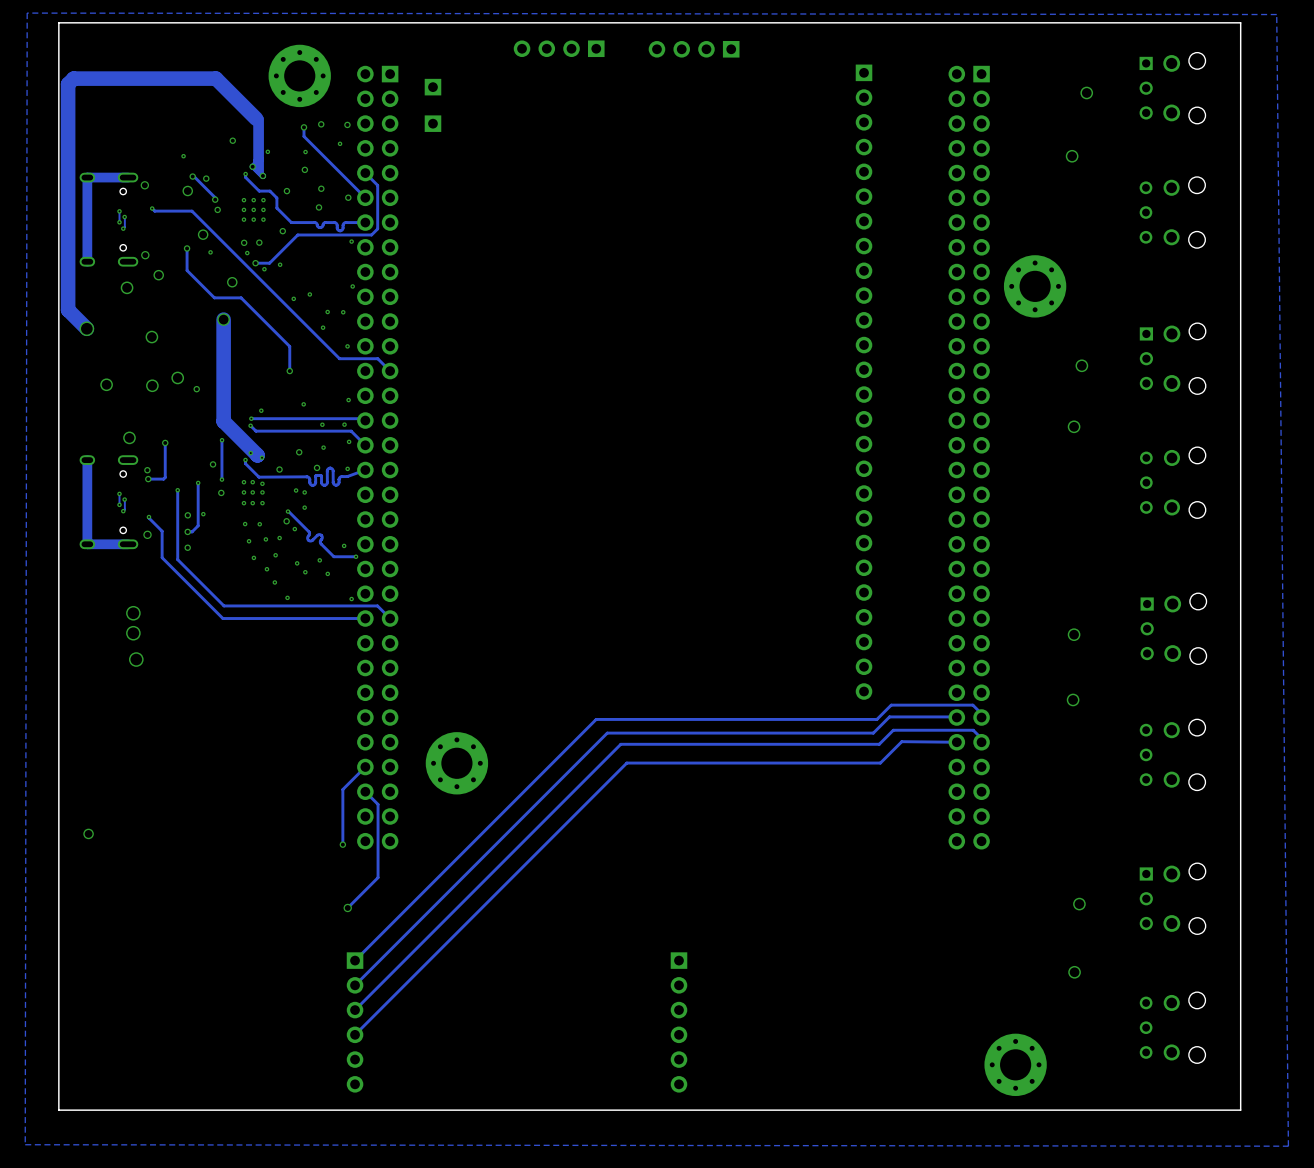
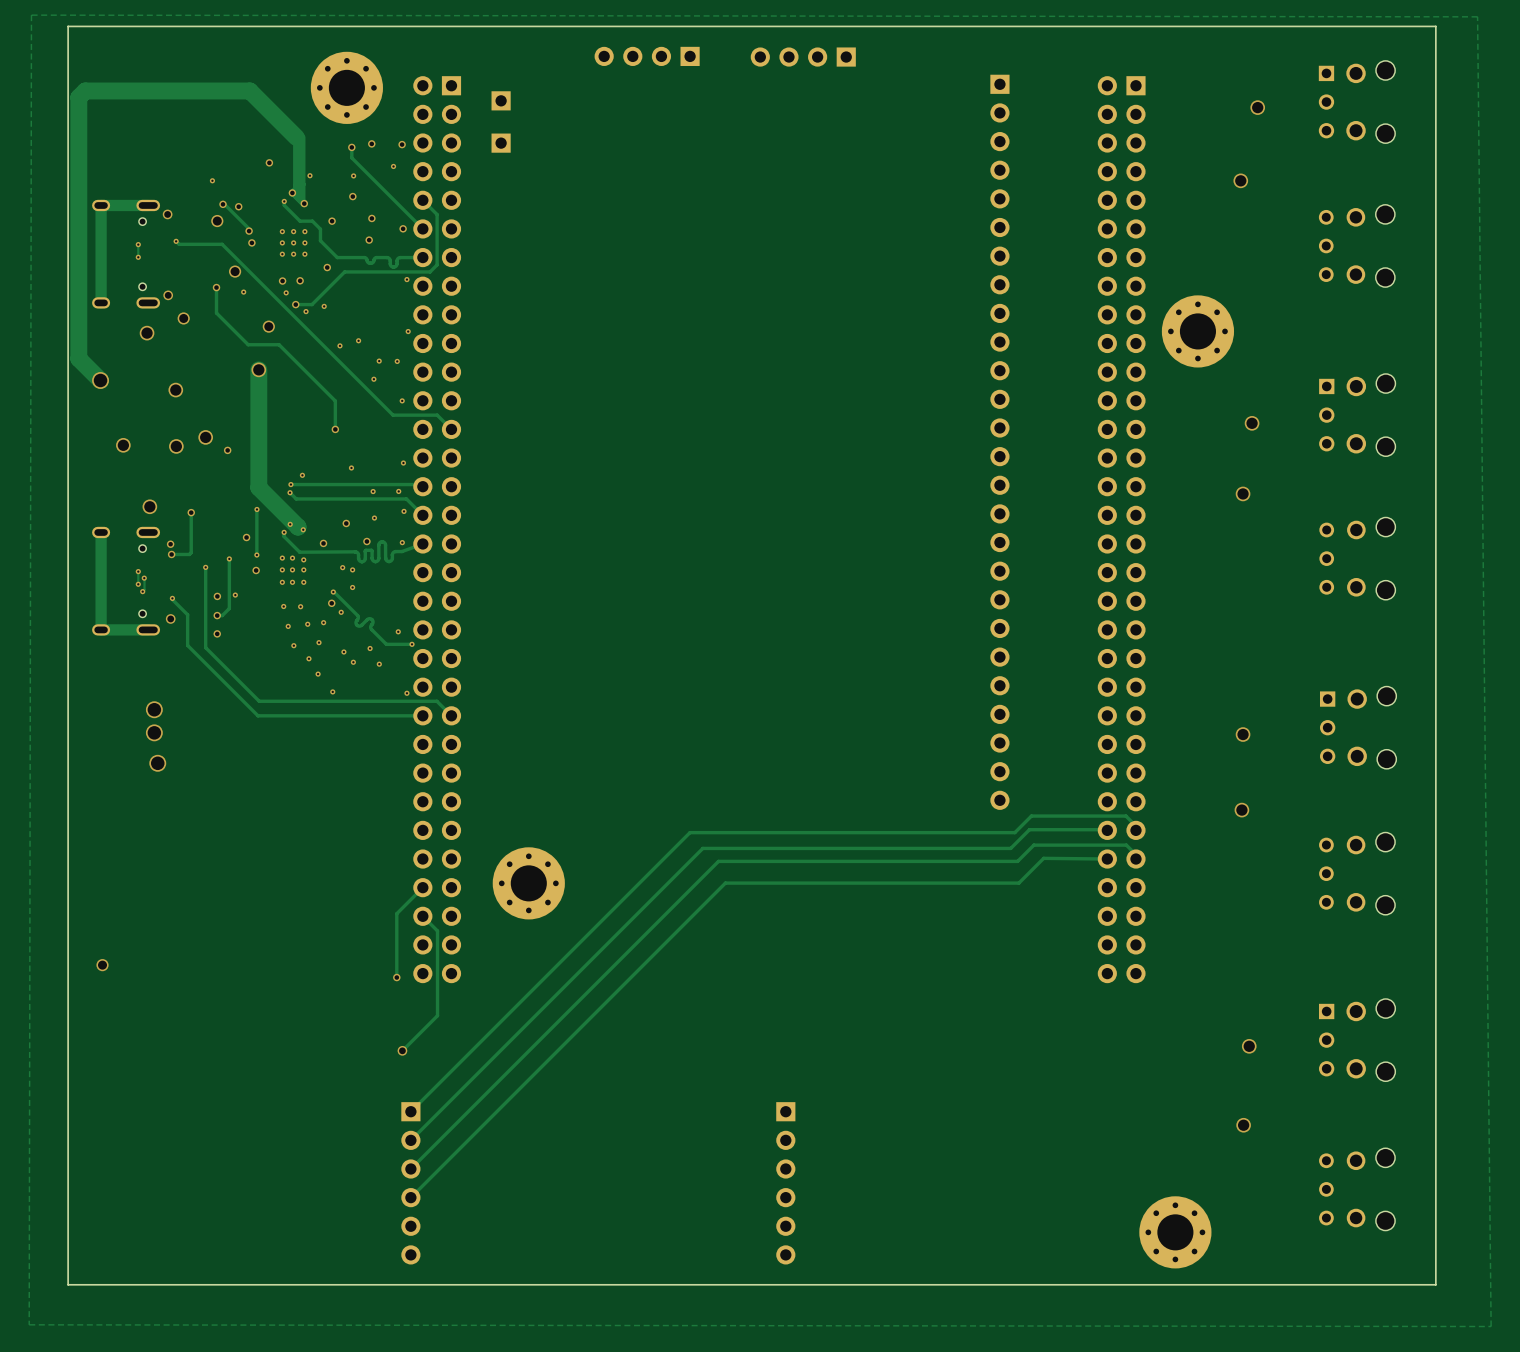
track: (124, 217) (123, 228) -> none
via: (124, 217) -> none
via: (123, 228) -> none

